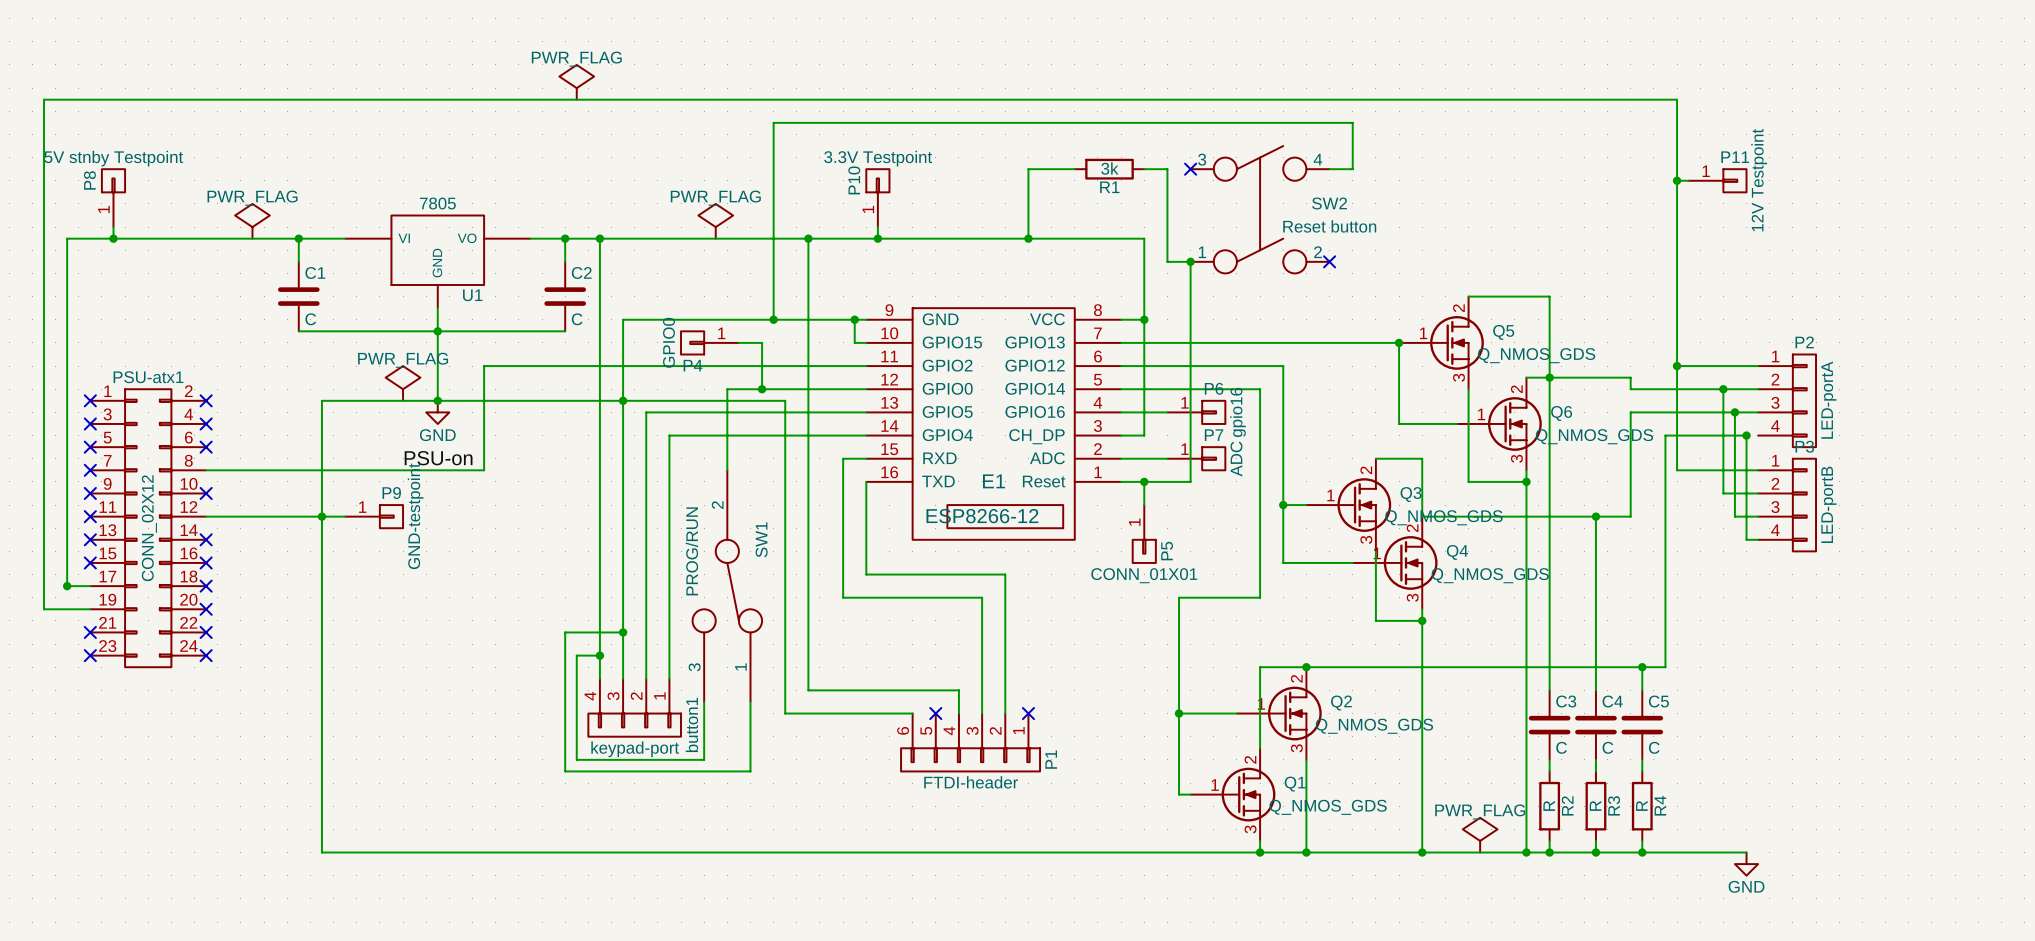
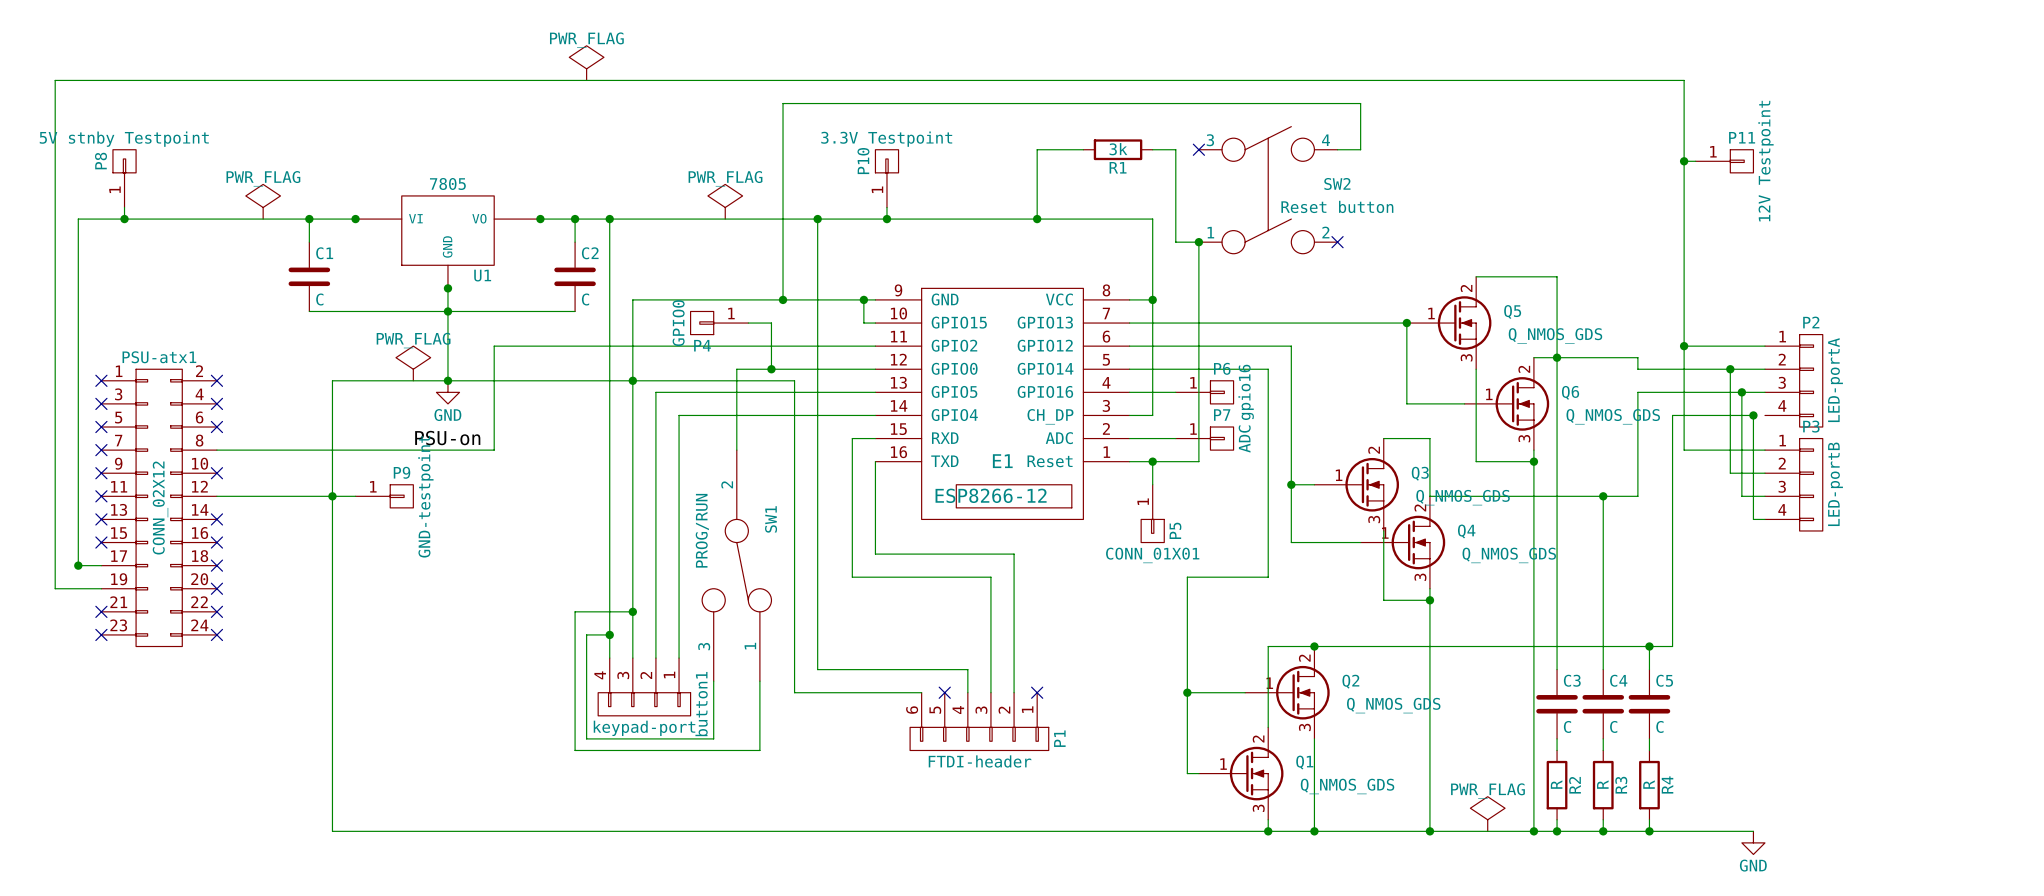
junction: none -> (355, 219)
junction: none -> (540, 219)
junction: none -> (447, 288)

